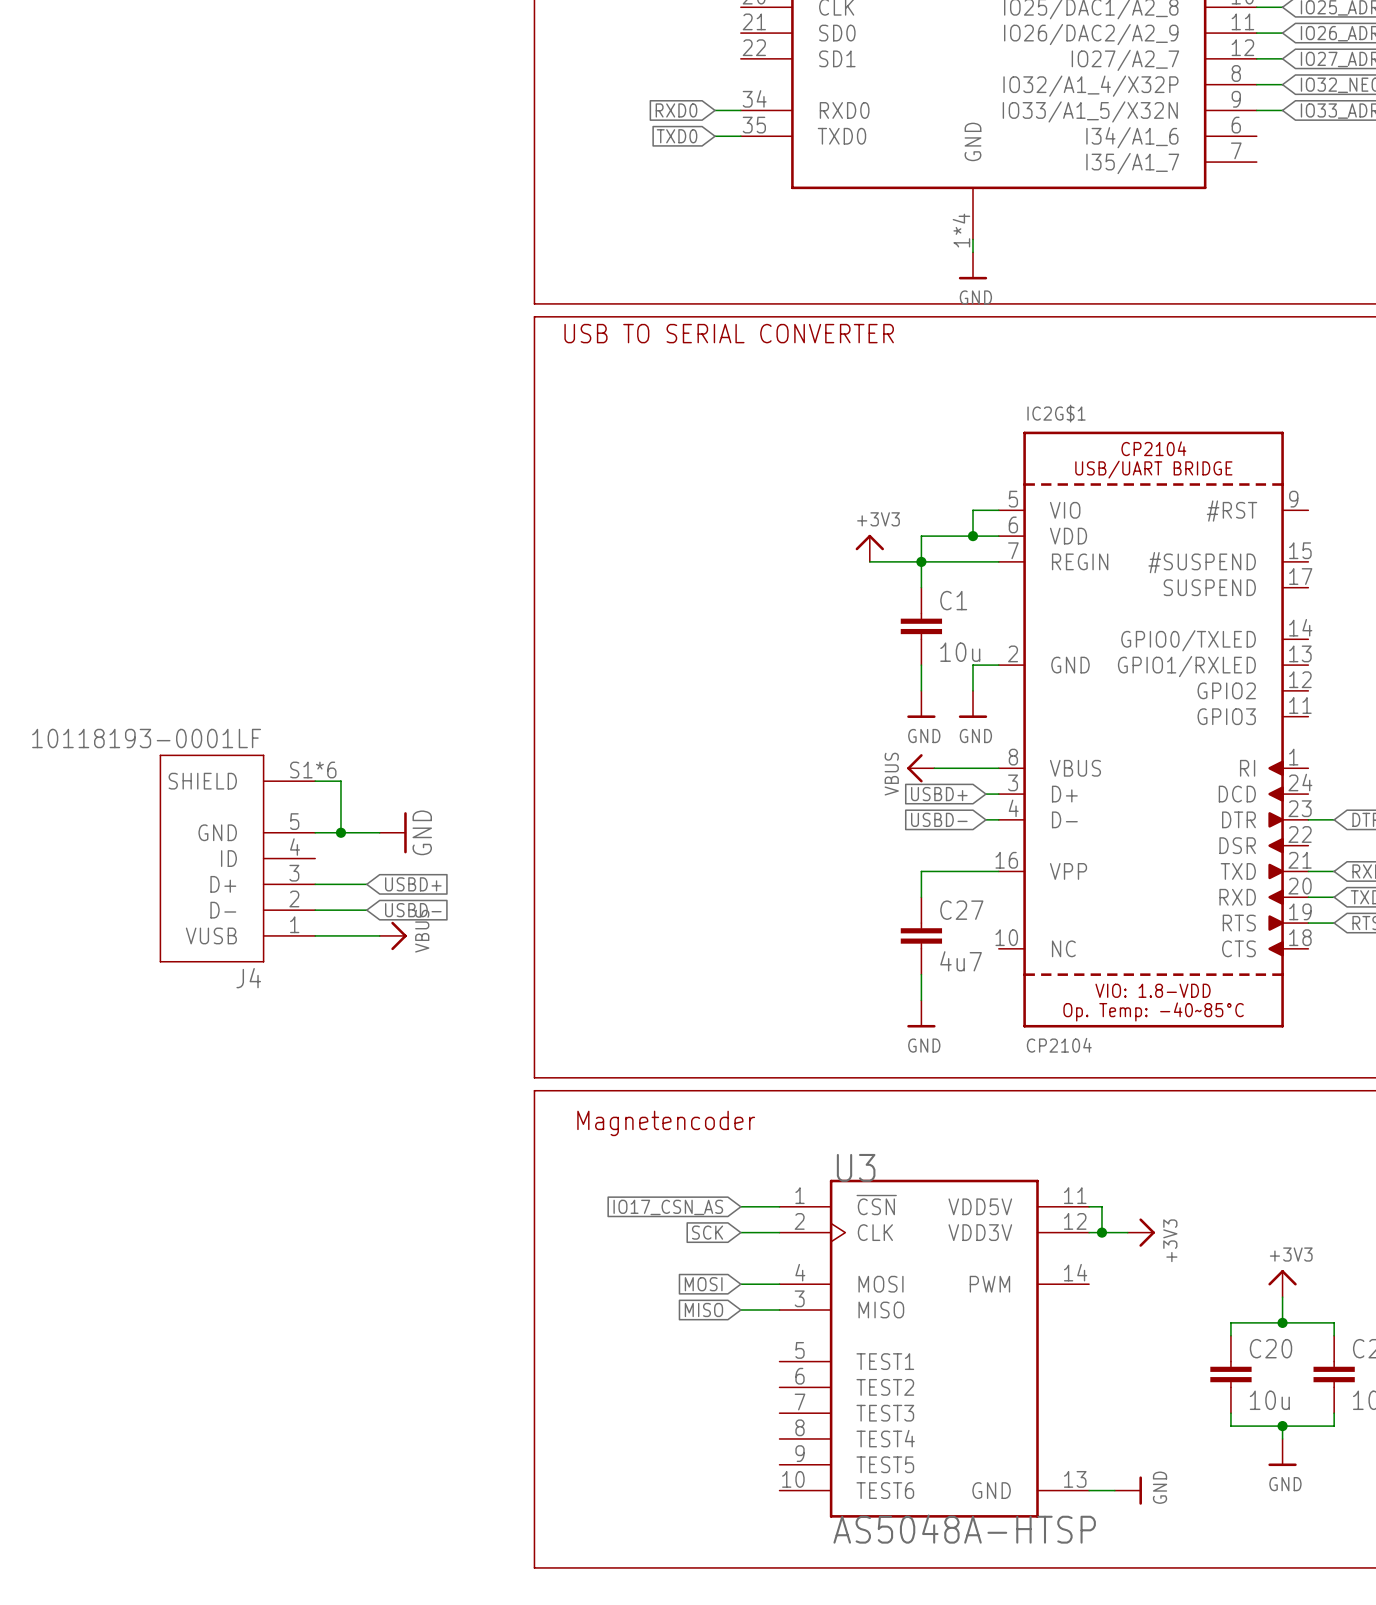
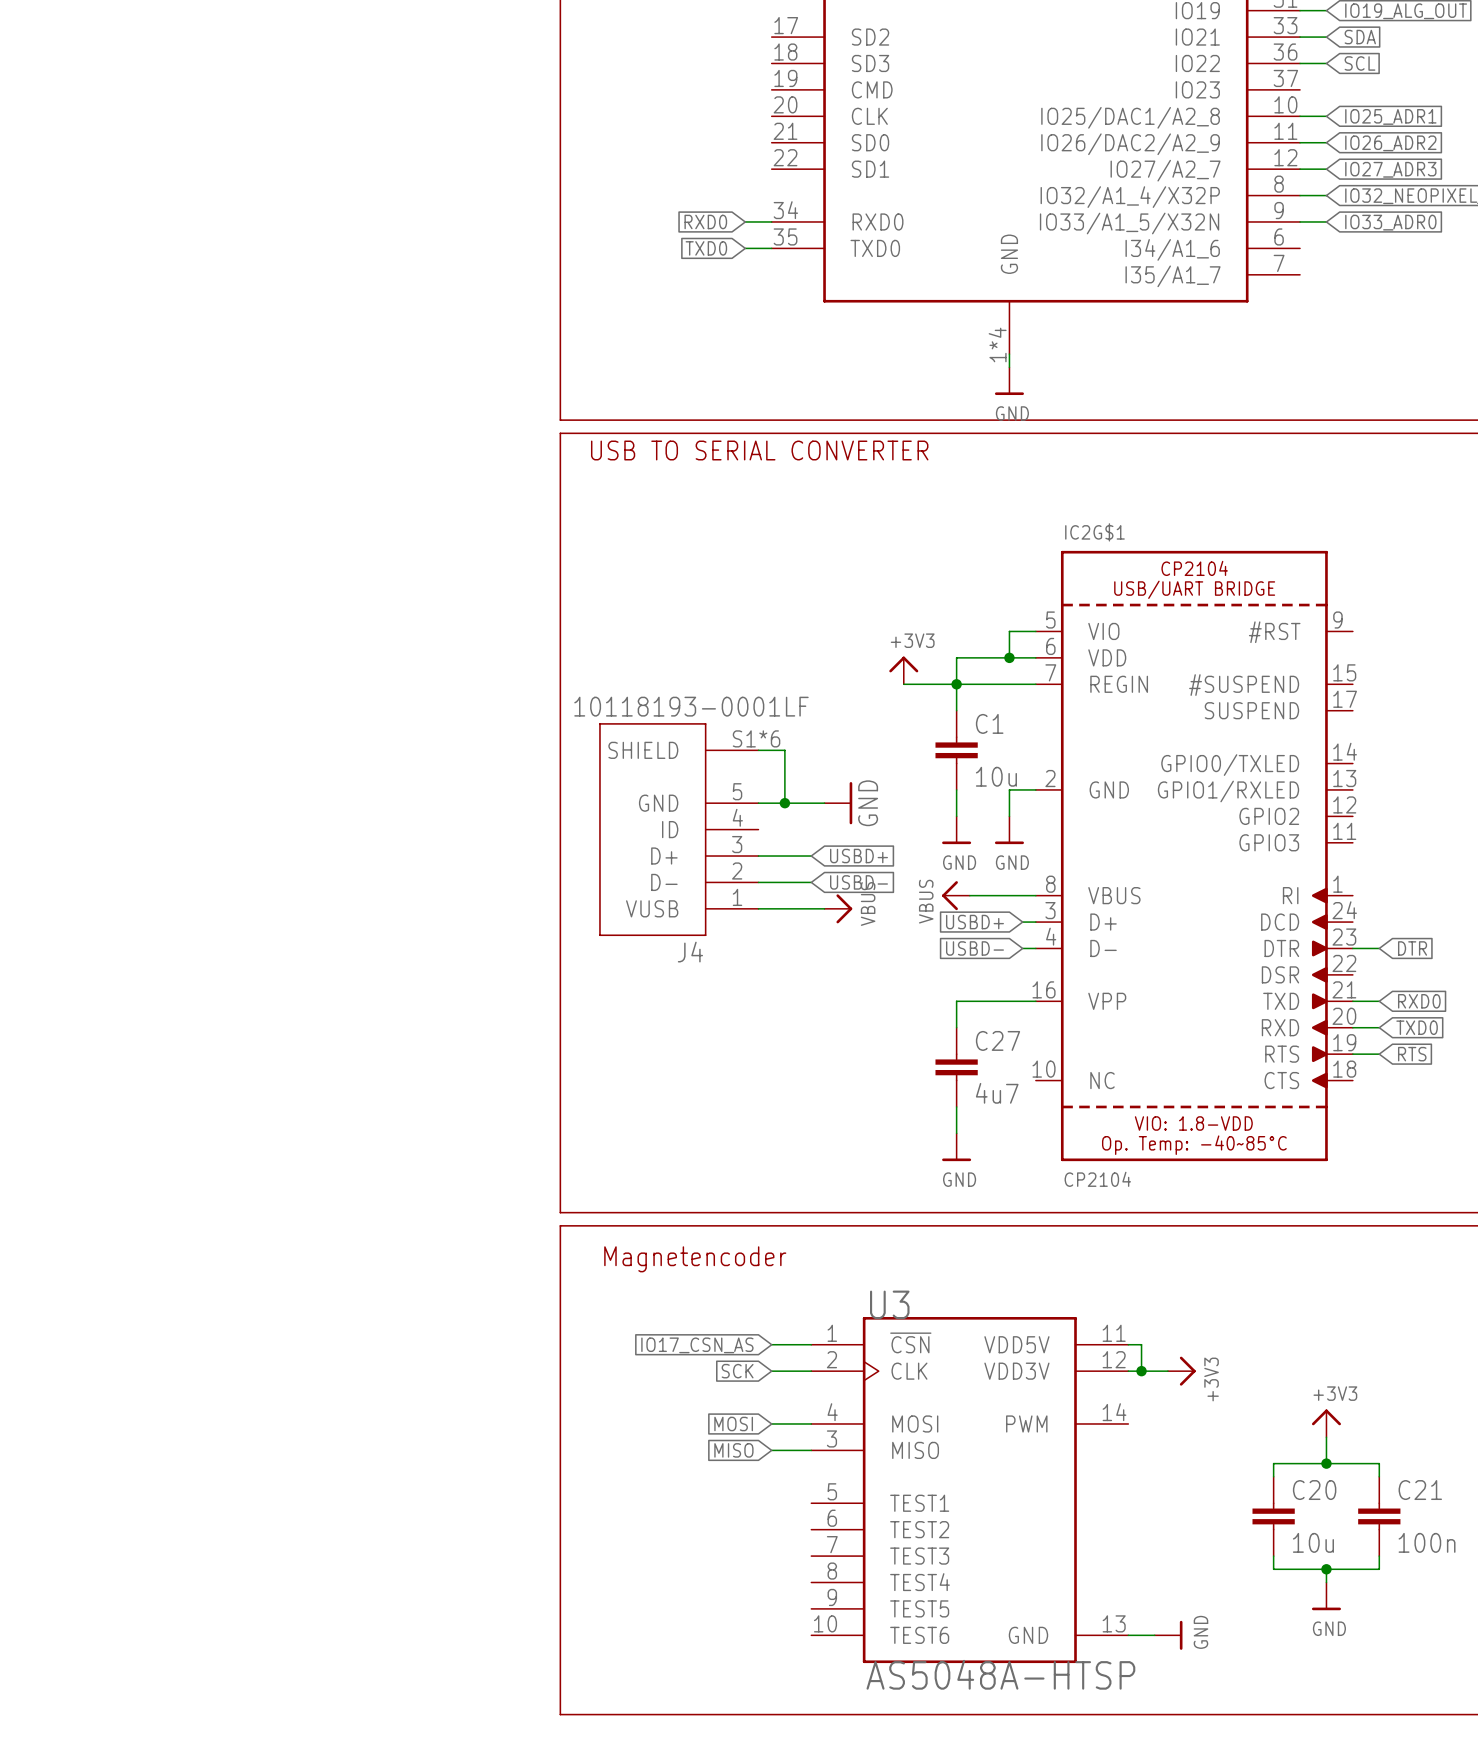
wire: none -> (758, 750) (784, 750) (784, 803)
wire: none -> (758, 803) (824, 803)
junction: none -> (784, 803)
power symbol: none -> GND (838, 803)
wire: none -> (758, 856) (811, 856)
global label: none -> USBD+ (859, 856)
J4 value position: 10118193-0001LF (146, 738) -> 10118193-0001LF (691, 706)
wire: none -> (758, 882) (811, 882)
global label: none -> USBD- (859, 882)
wire: (315, 781) (340, 781) (340, 832) -> none
wire: none -> (758, 908) (824, 908)
power symbol: none -> VBUS (838, 908)
wire: (315, 832) (379, 832) -> none
junction: (340, 832) -> none
power symbol: GND (393, 832) -> none
J4 position: (237, 858) -> (678, 829)
wire: (315, 884) (366, 884) -> none
global label: USBD+ (413, 884) -> none
wire: (315, 910) (366, 910) -> none
global label: USBD- (413, 910) -> none
wire: (315, 935) (379, 935) -> none
power symbol: VBUS (393, 935) -> none

